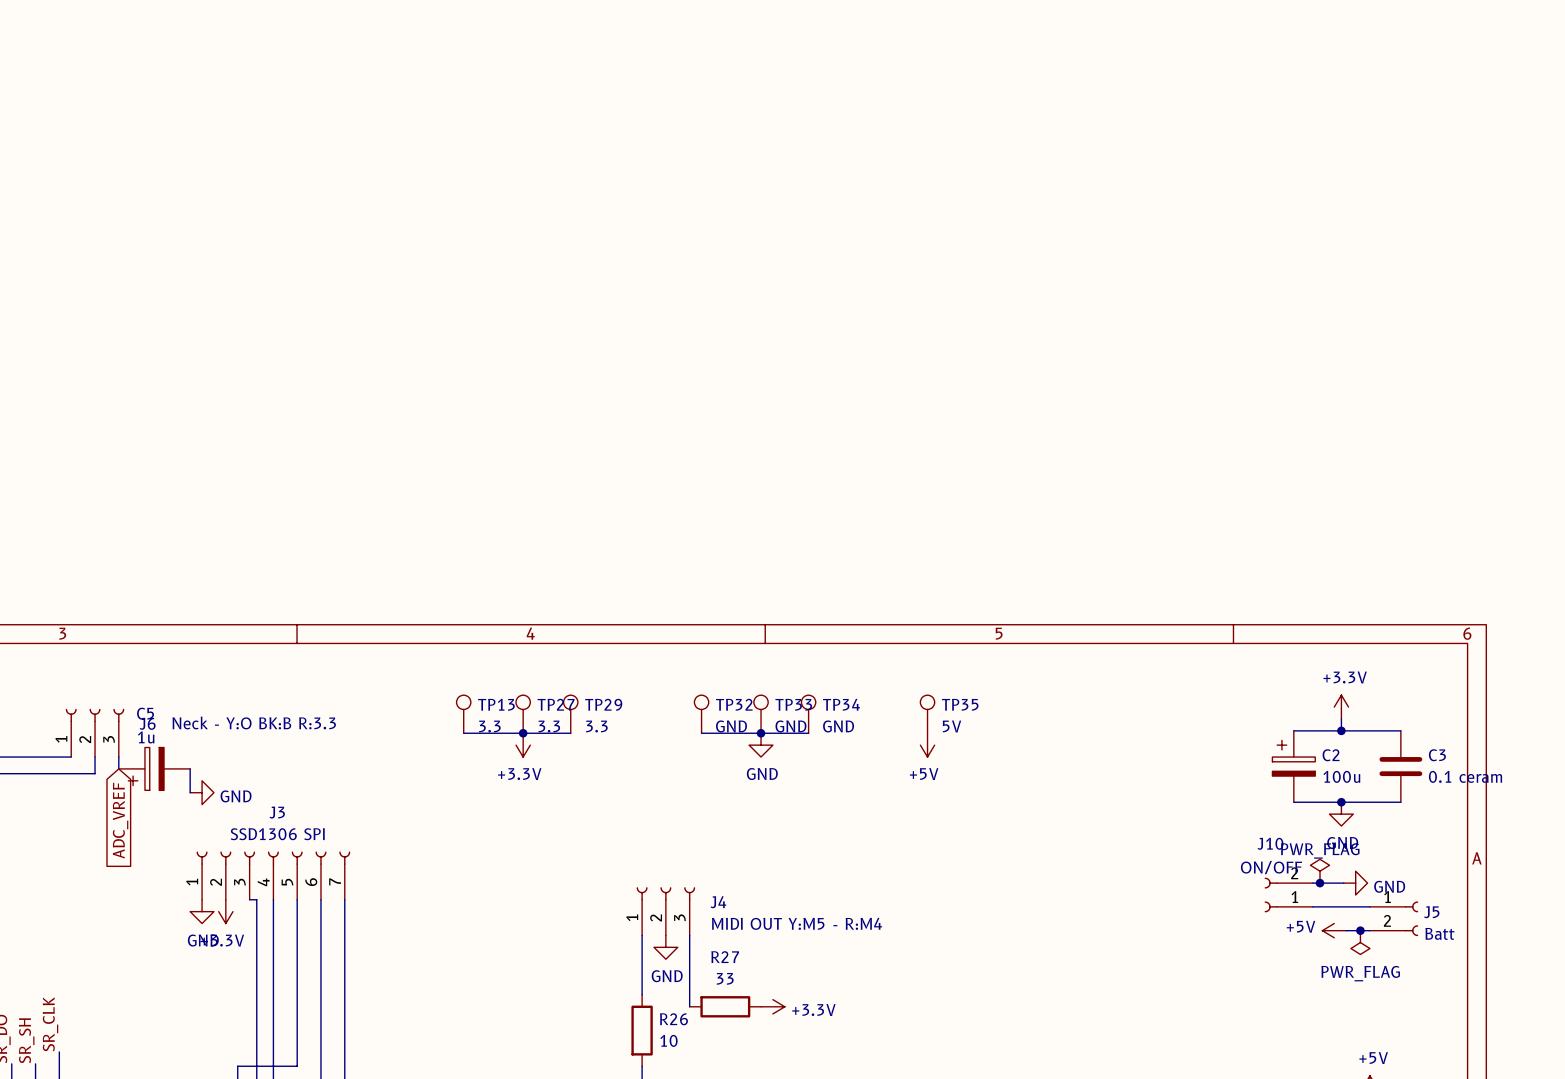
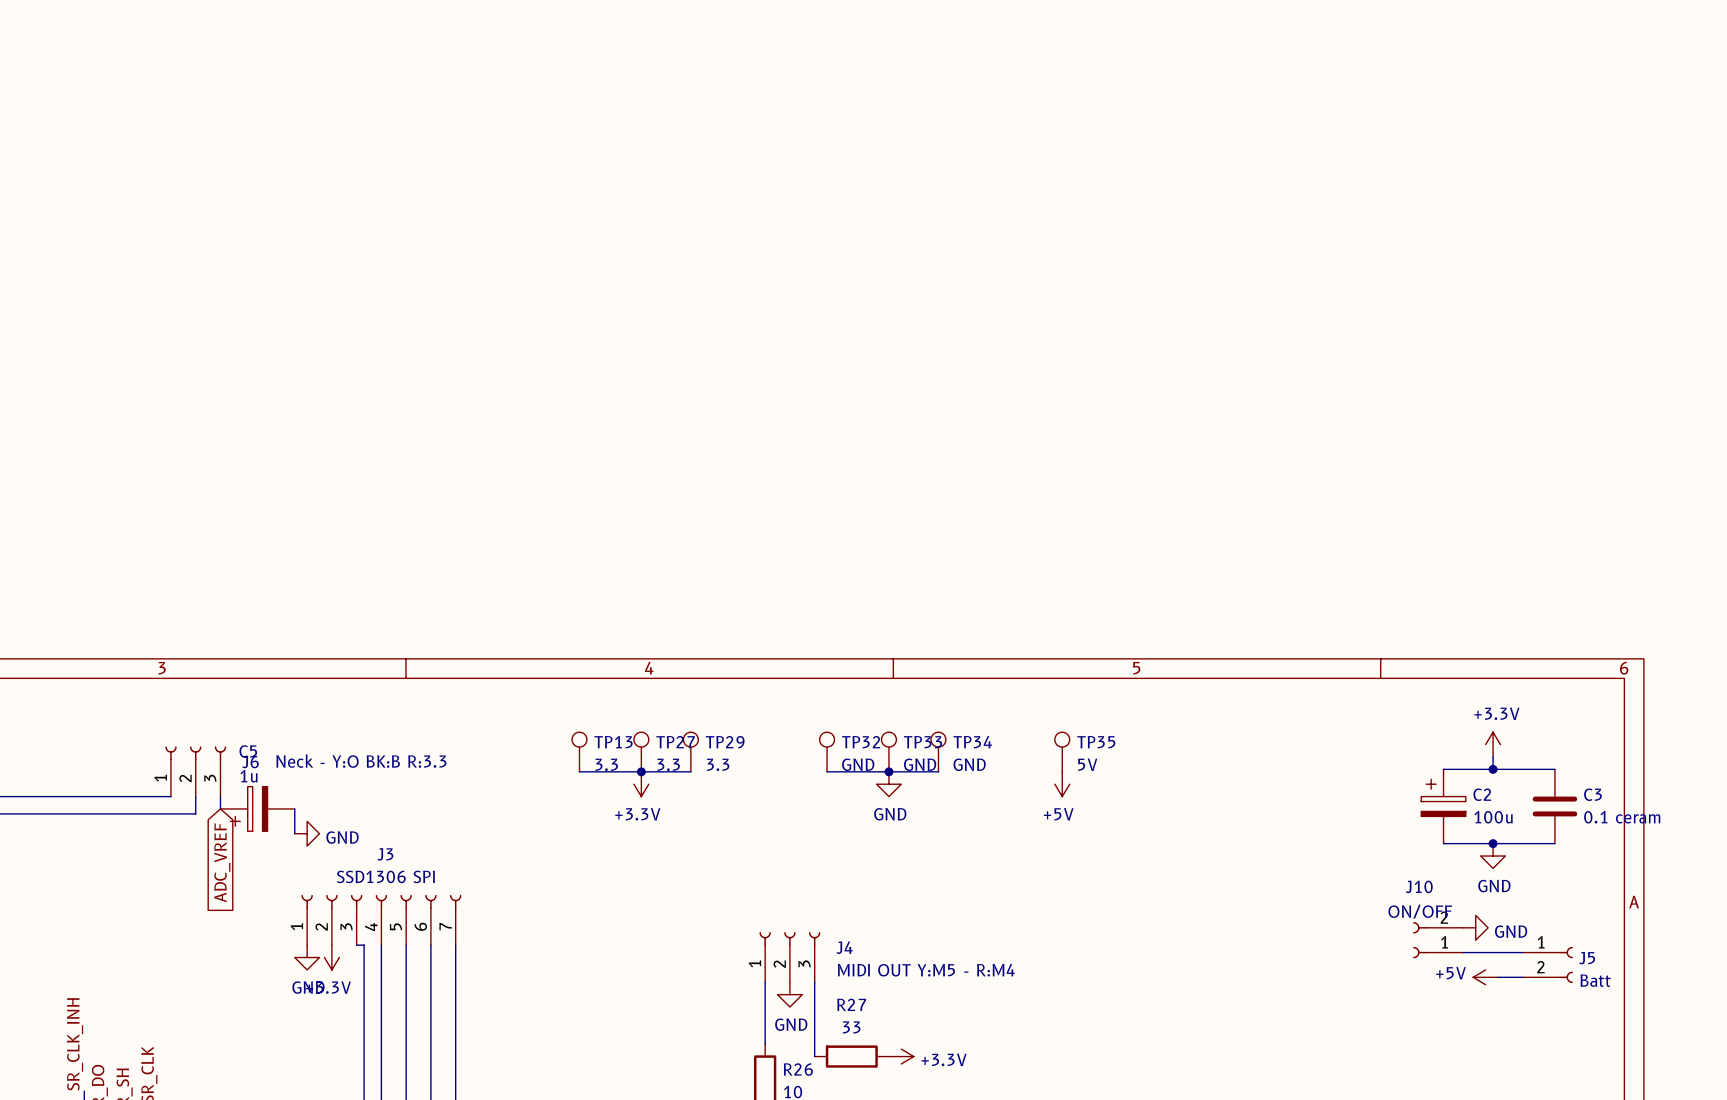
power symbol: PWR_FLAG (1320, 871) -> none
wire: (1312, 883) (1343, 883) -> none
junction: (1320, 883) -> none
power symbol position: GND (1355, 883) -> GND (1475, 927)
junction: (1360, 930) -> none
power symbol: PWR_FLAG (1360, 942) -> none

